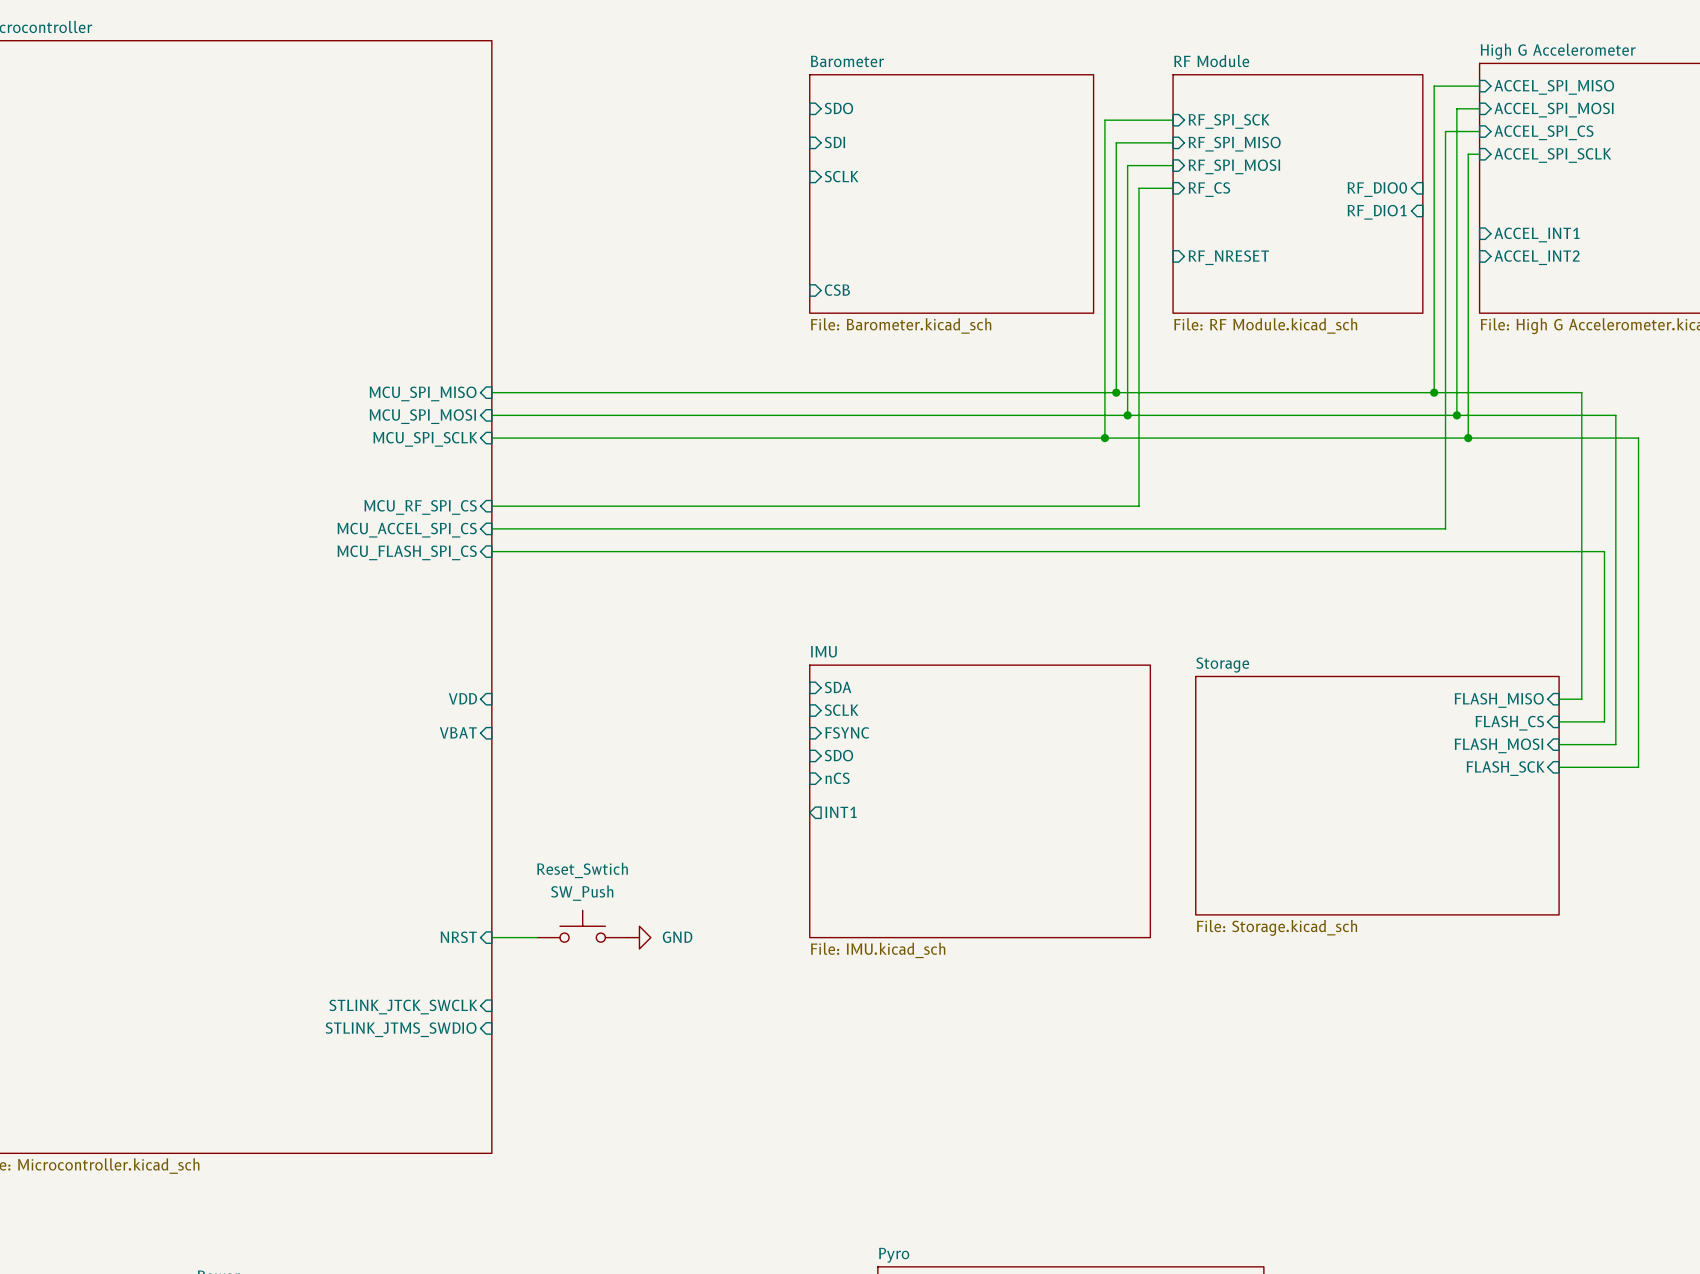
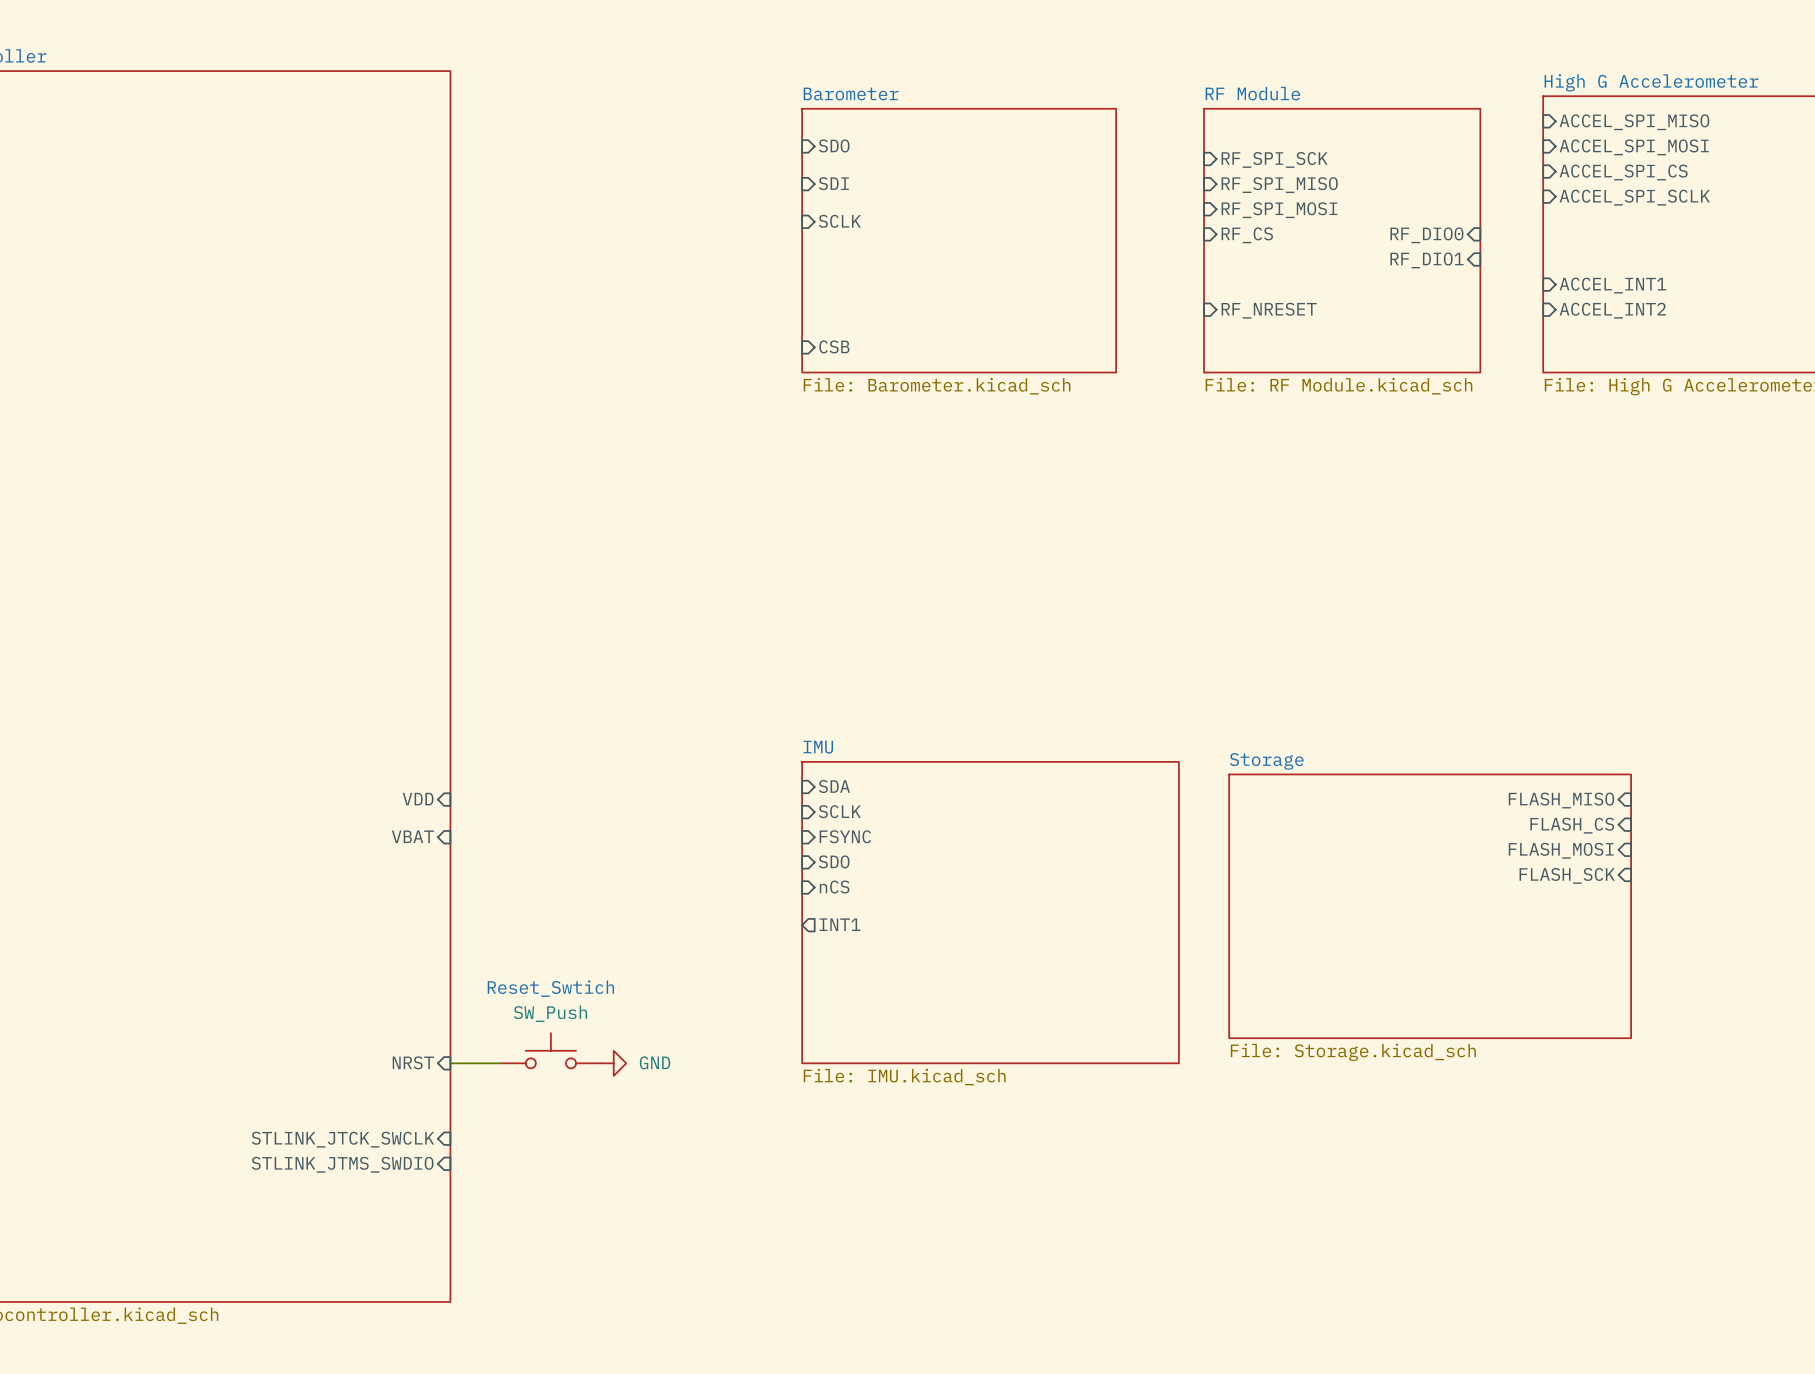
wire: (1479, 86) (1434, 86) (1434, 392) -> none
wire: (1479, 108) (1456, 108) (1456, 415) -> none
wire: (1173, 120) (1104, 120) (1104, 438) -> none
wire: (1479, 131) (1445, 131) (1445, 528) (491, 528) -> none
wire: (1173, 142) (1116, 142) (1116, 392) -> none
wire: (1479, 154) (1468, 154) (1468, 438) -> none
wire: (1173, 165) (1127, 165) (1127, 415) -> none
wire: (1173, 188) (1138, 188) (1138, 506) (491, 506) -> none
wire: (491, 392) (1581, 392) (1581, 699) (1559, 699) -> none
junction: (1116, 392) -> none
junction: (1434, 392) -> none
sheet pin: MCU_SPI_MISO (423, 393) -> none
wire: (491, 415) (1615, 415) (1615, 744) (1559, 744) -> none
junction: (1127, 415) -> none
junction: (1456, 415) -> none
sheet pin: MCU_SPI_MOSI (422, 416) -> none
wire: (491, 438) (1638, 438) (1638, 767) (1559, 767) -> none
junction: (1104, 438) -> none
junction: (1468, 438) -> none
sheet pin: MCU_SPI_SCLK (425, 439) -> none
sheet pin: MCU_RF_SPI_CS (420, 507) -> none
sheet pin: MCU_ACCEL_SPI_CS (407, 530) -> none
wire: (491, 551) (1604, 551) (1604, 721) (1559, 721) -> none
sheet pin: MCU_FLASH_SPI_CS (407, 552) -> none

